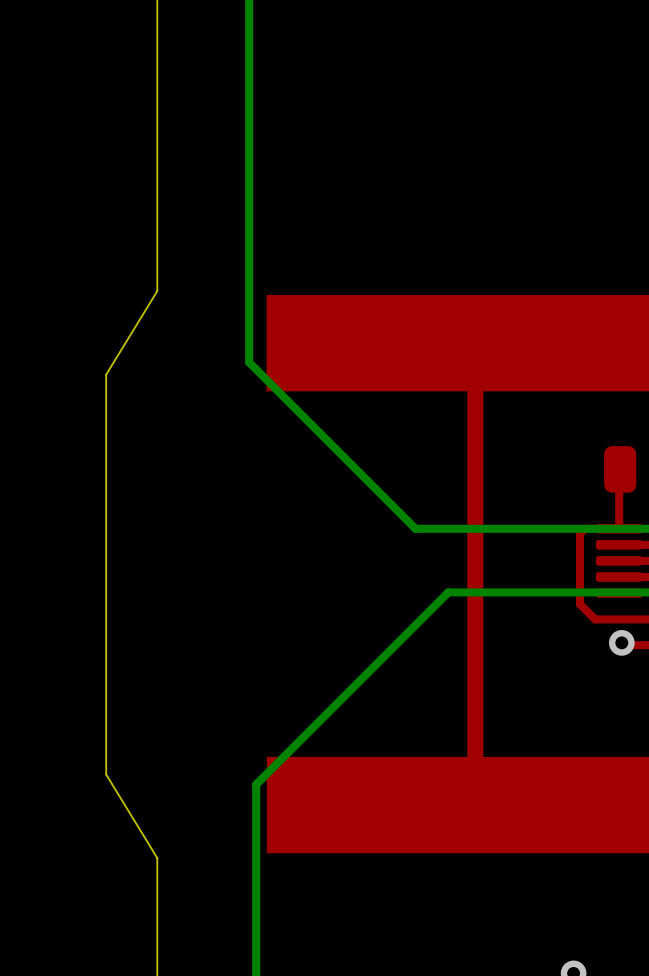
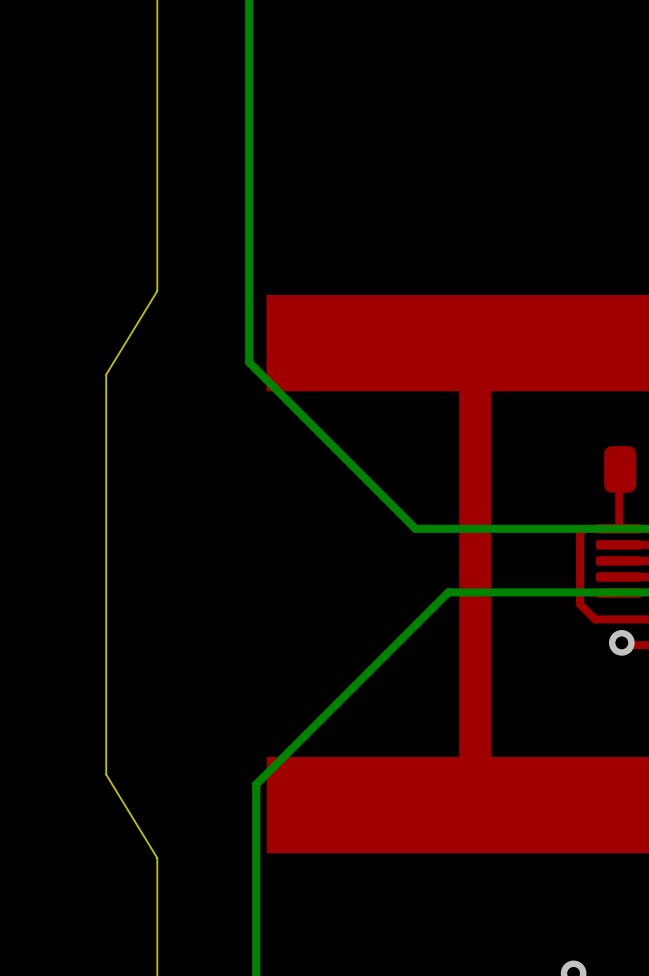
top track width: thin (475, 343) (475, 801) -> thick (475, 343) (475, 801)

